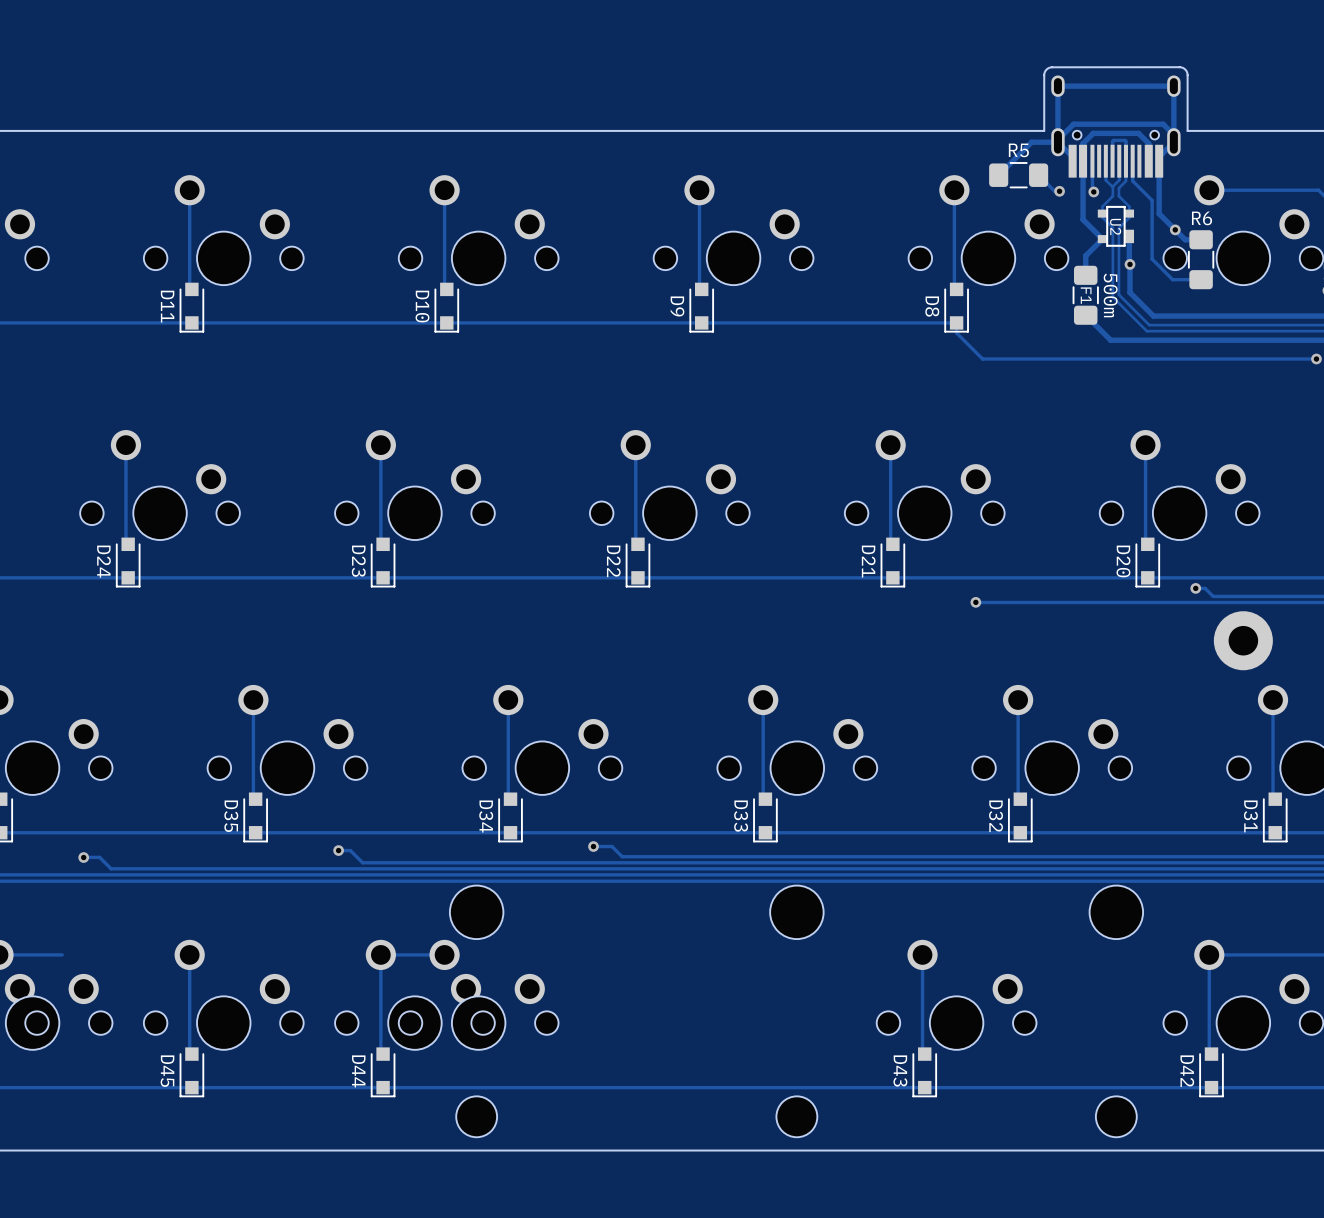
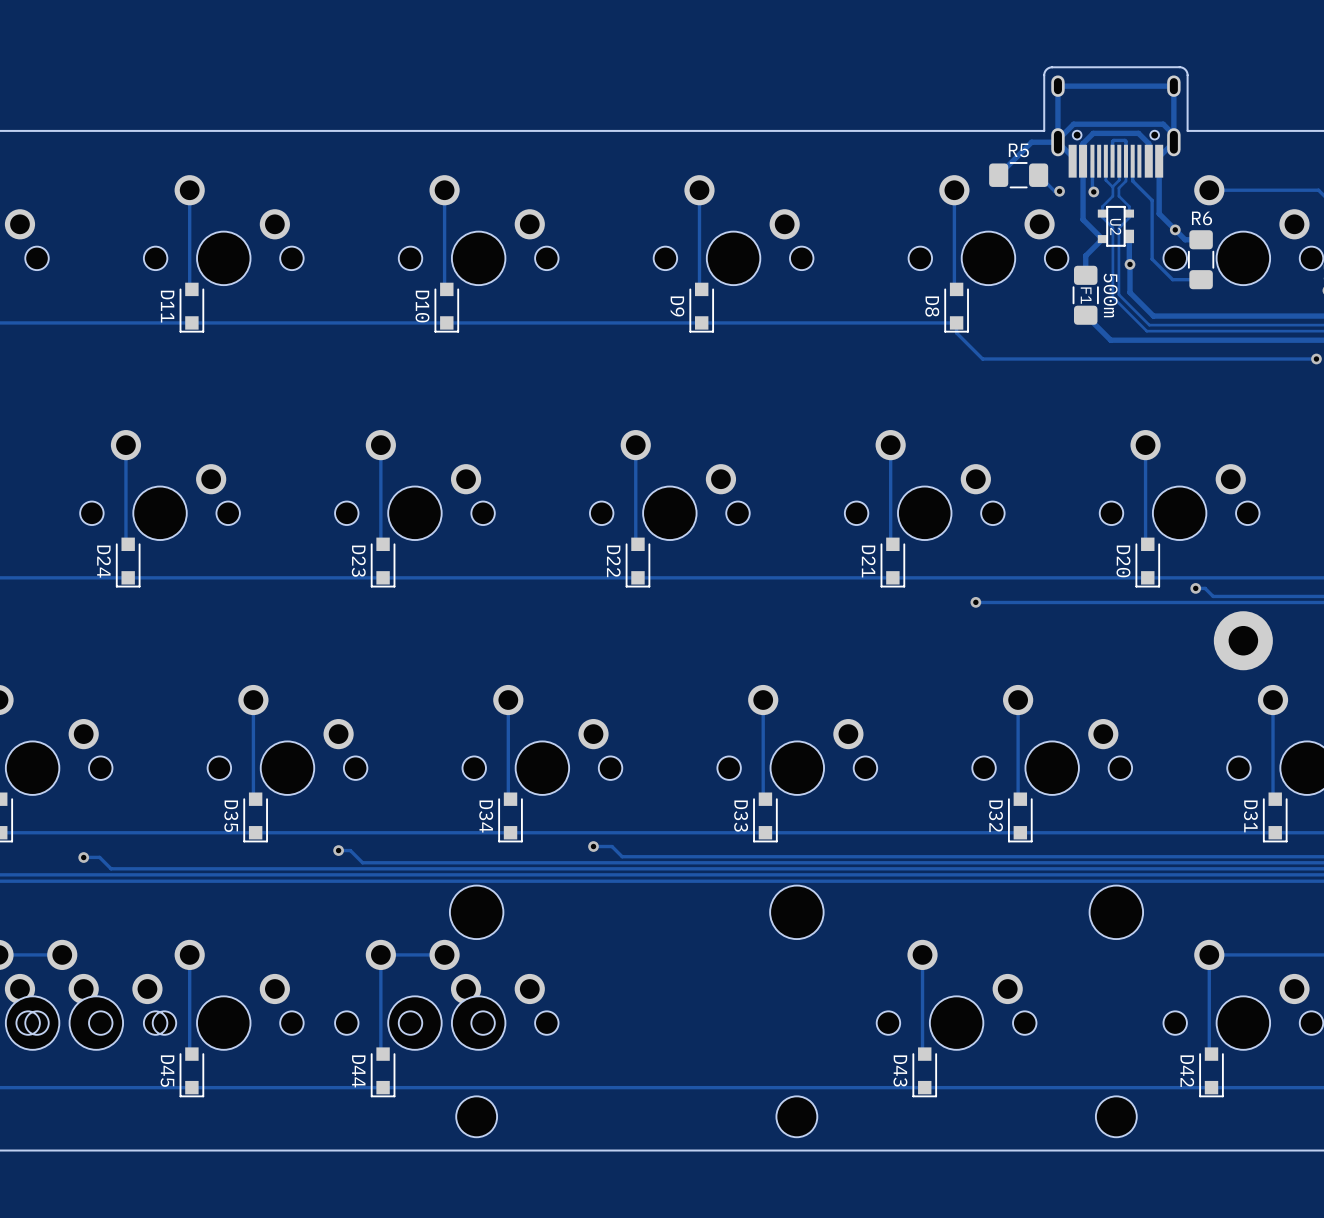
part: none -> (96, 994)

